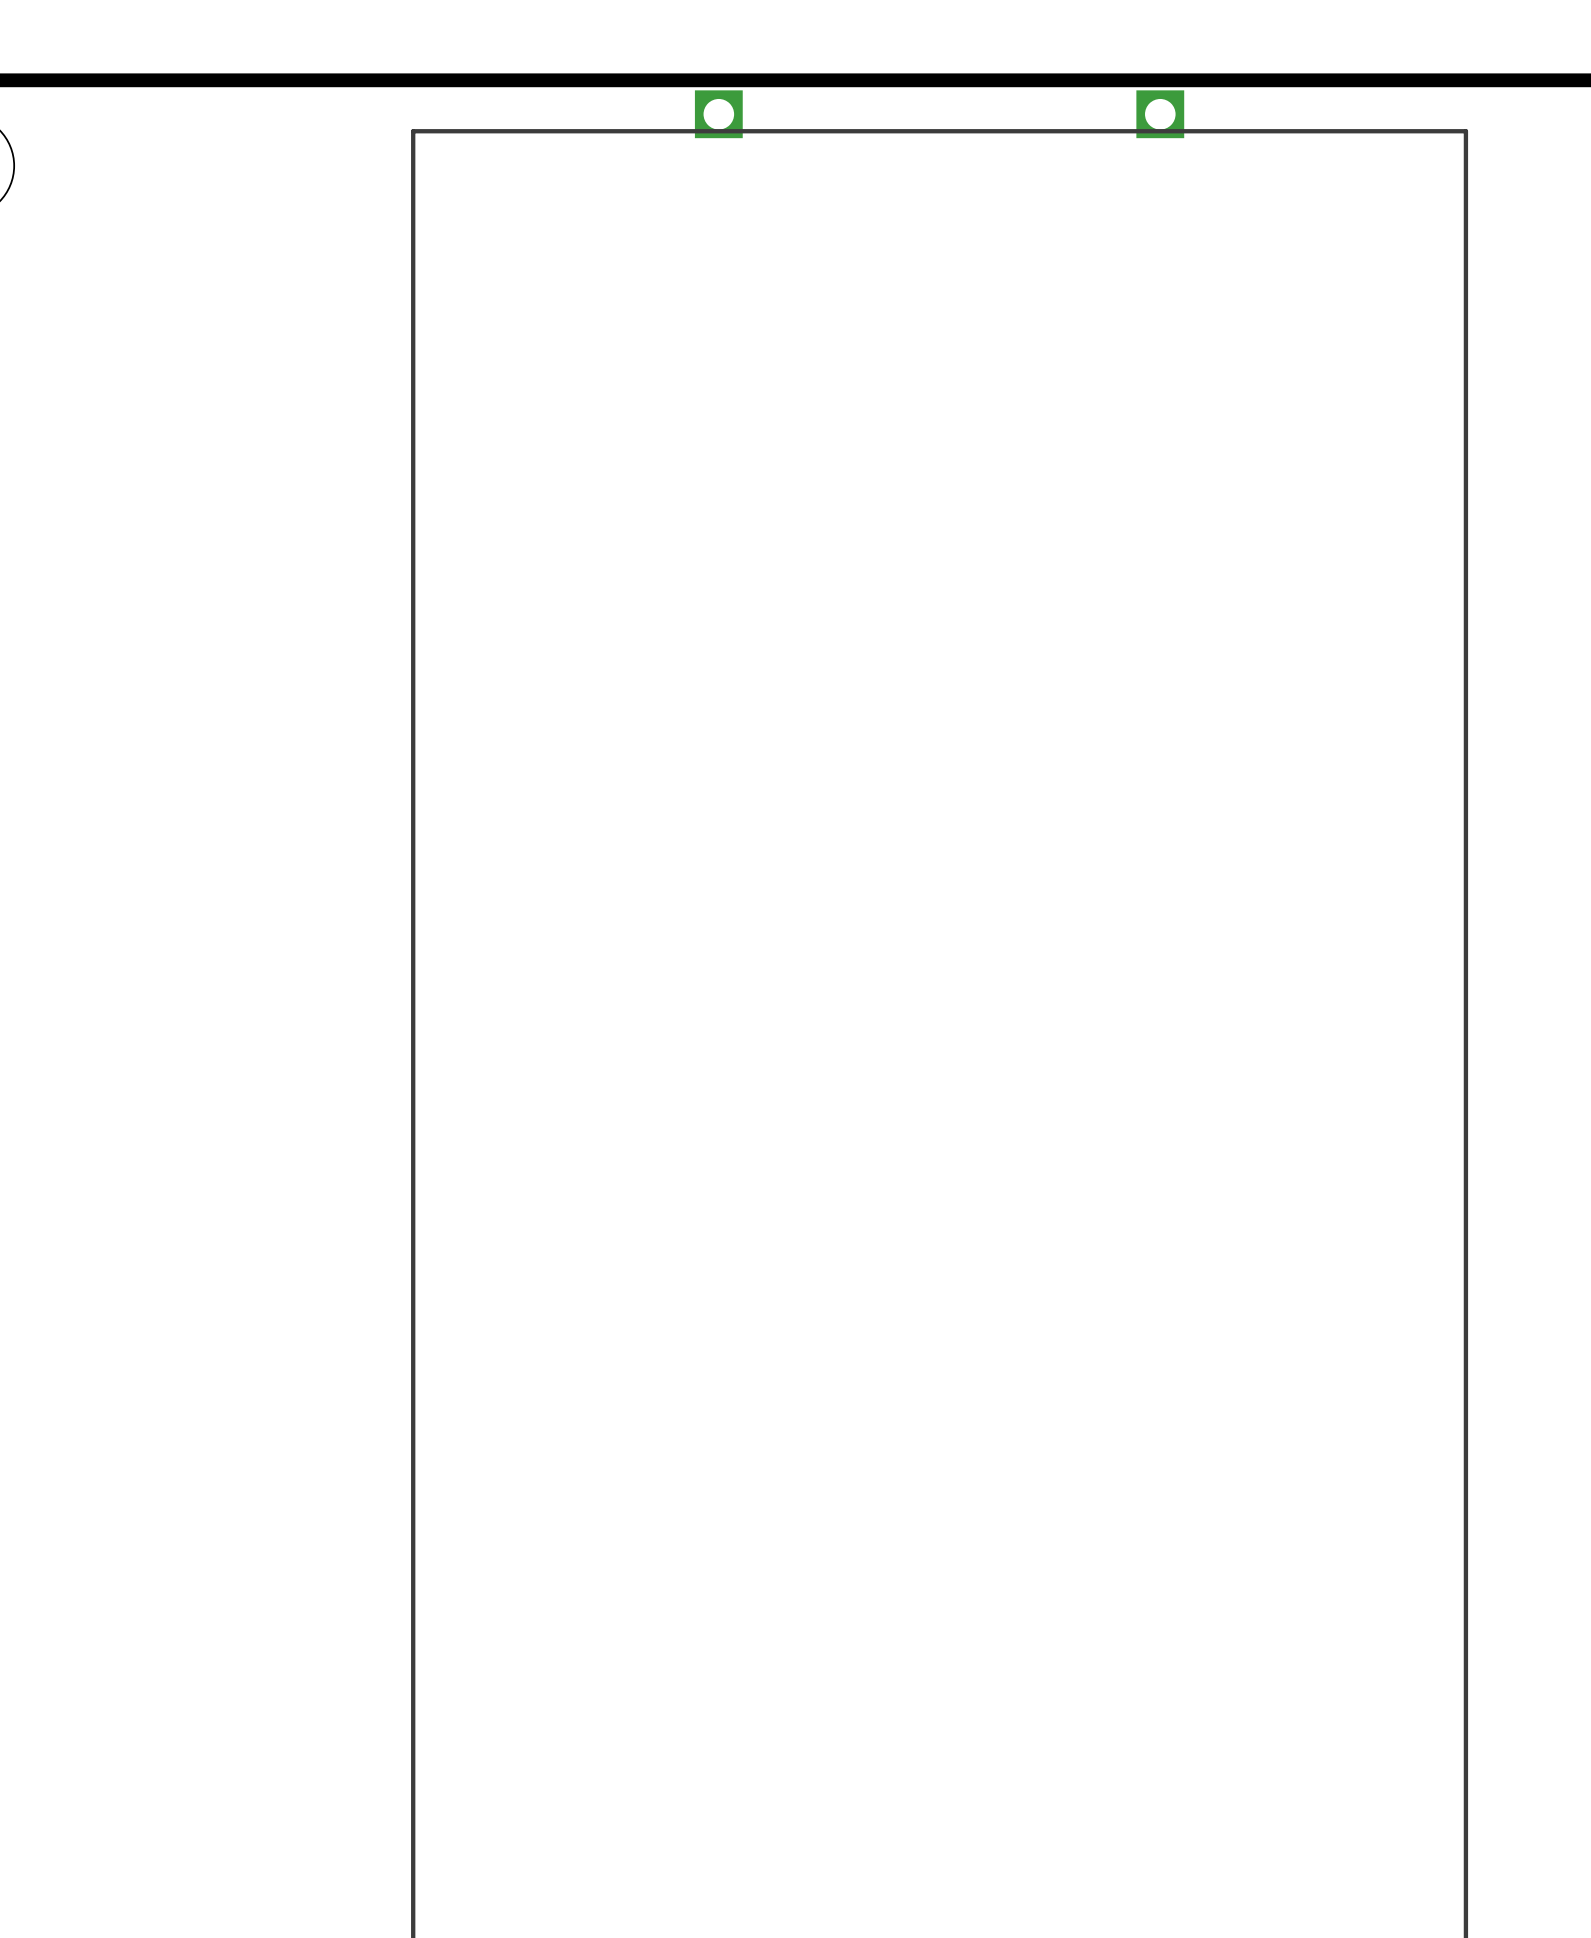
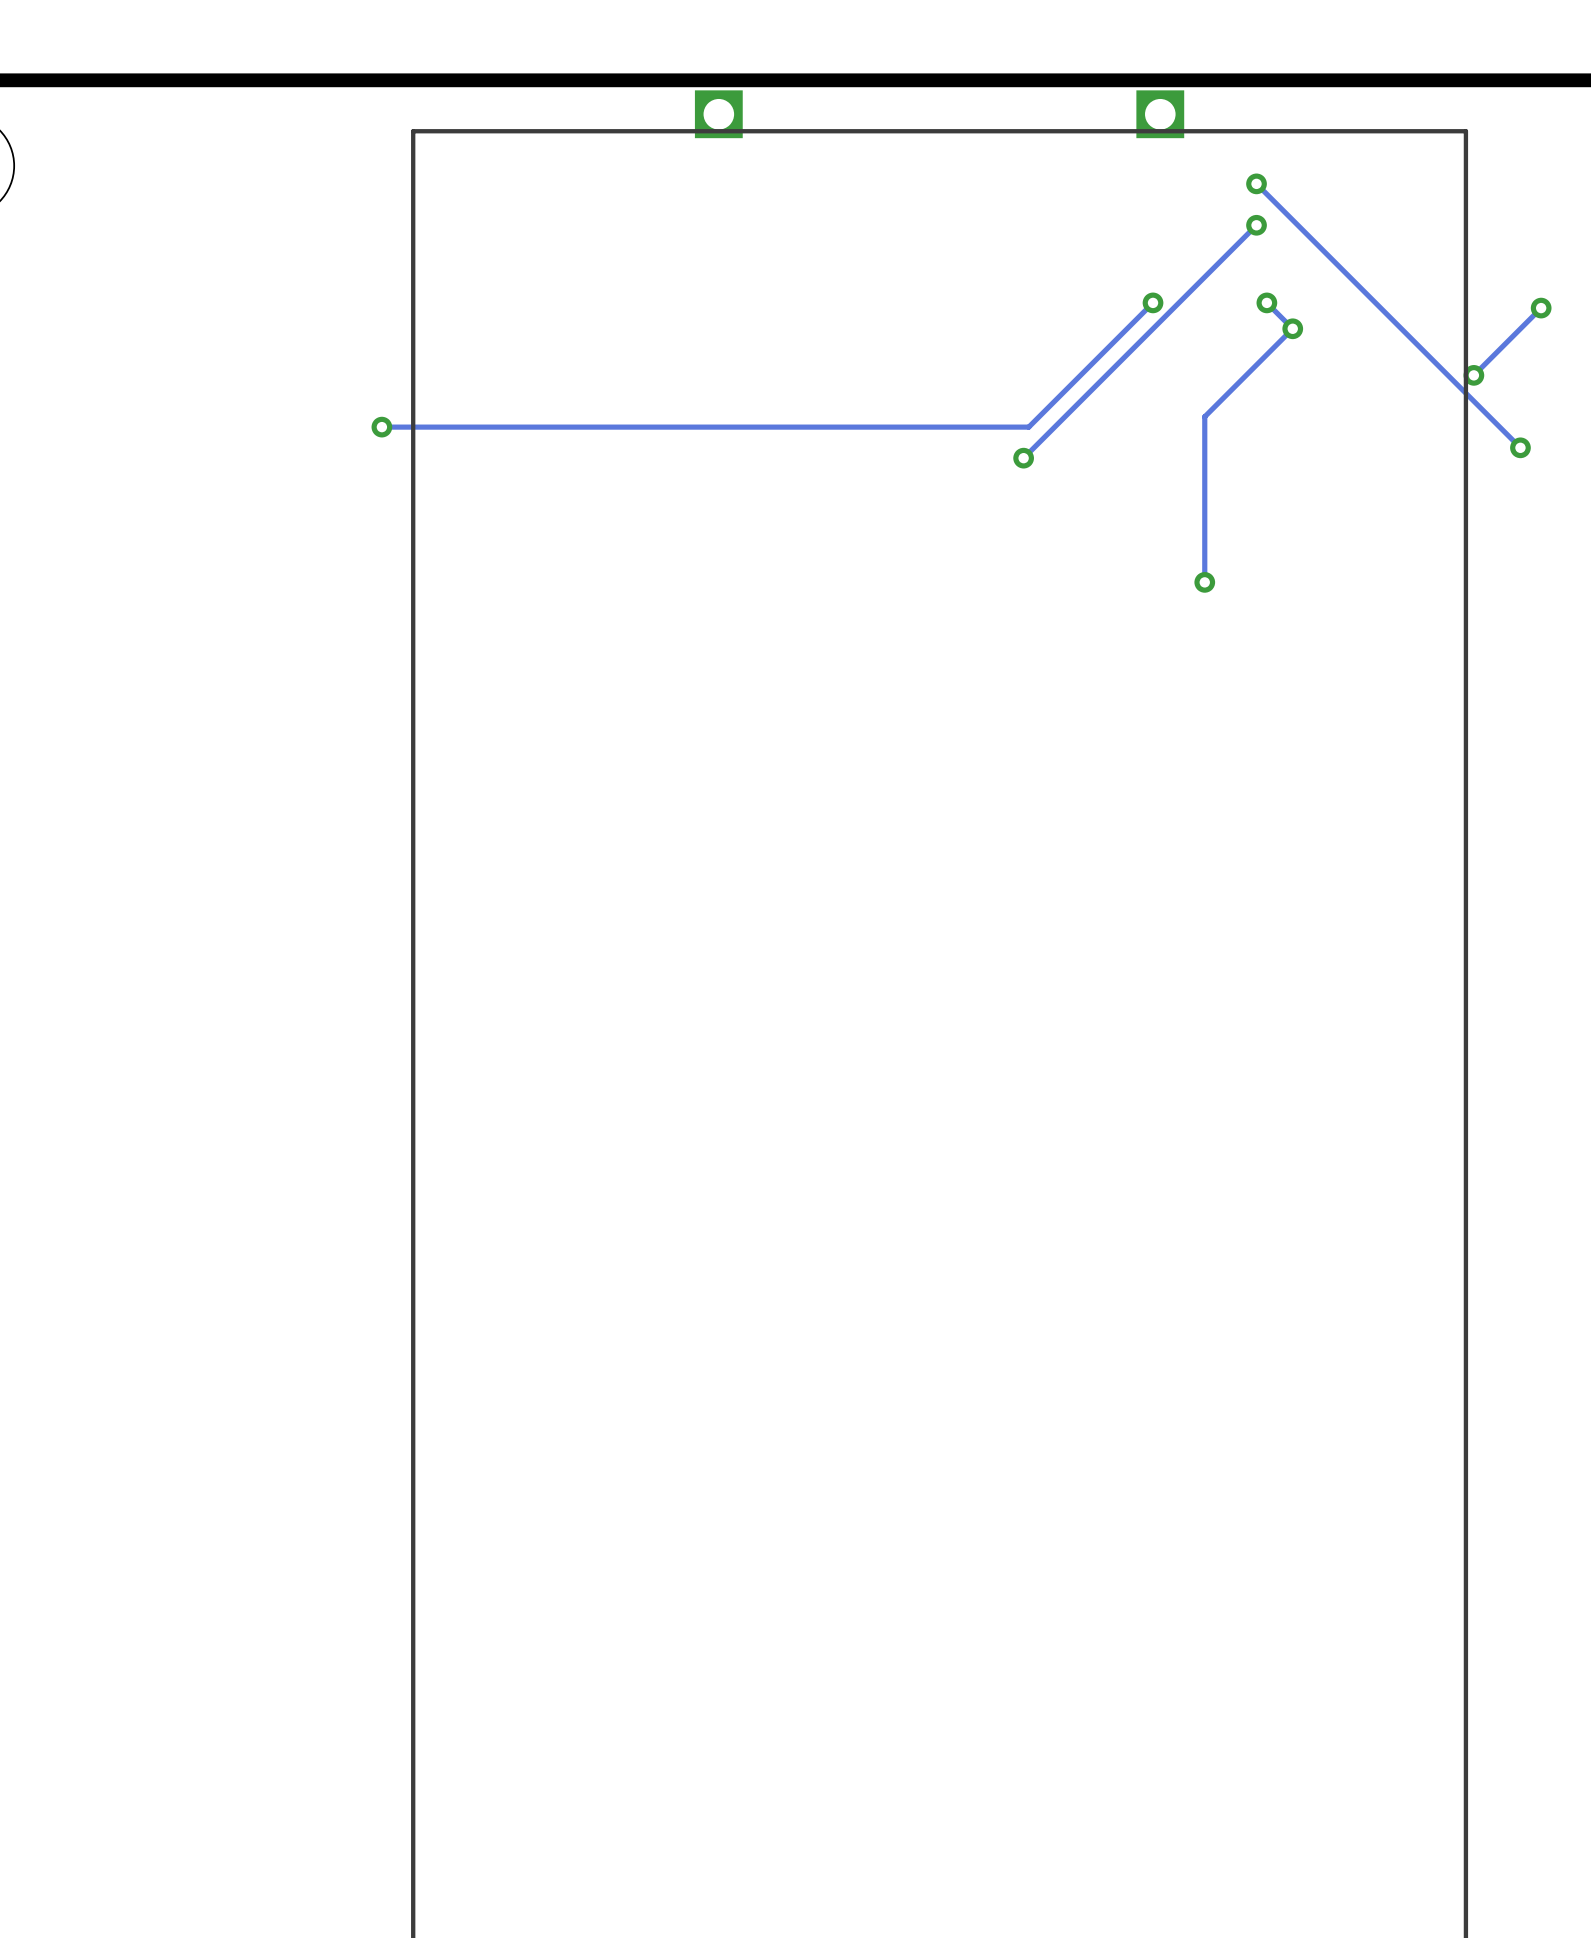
track: none -> (1256, 183) (1520, 447)
via: none -> (1256, 183)
track: none -> (1256, 225) (1023, 458)
via: none -> (1256, 225)
track: none -> (1153, 302) (1028, 427) (381, 427)
via: none -> (1153, 302)
track: none -> (1266, 302) (1292, 328) (1204, 416) (1204, 582)
via: none -> (1266, 302)
track: none -> (1541, 308) (1473, 375)
via: none -> (1541, 308)
via: none -> (1292, 328)
via: none -> (1473, 375)
via: none -> (381, 427)
via: none -> (1520, 447)
via: none -> (1023, 458)
via: none -> (1204, 582)

